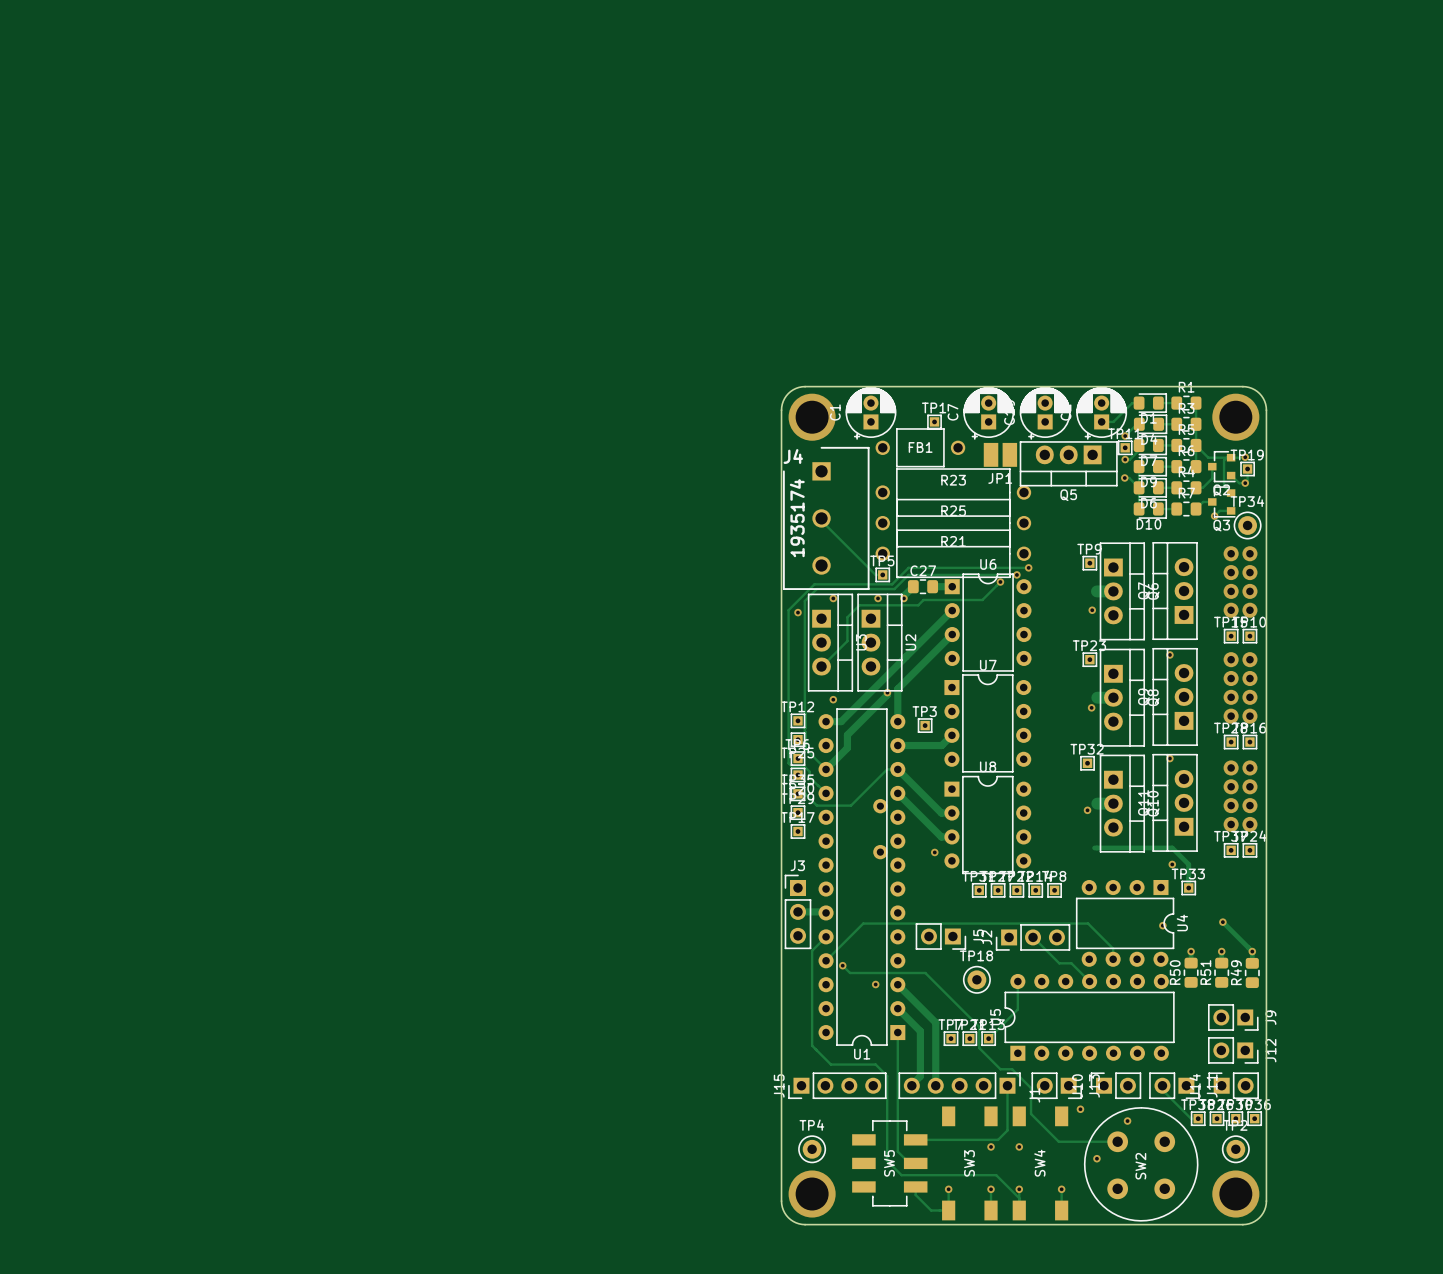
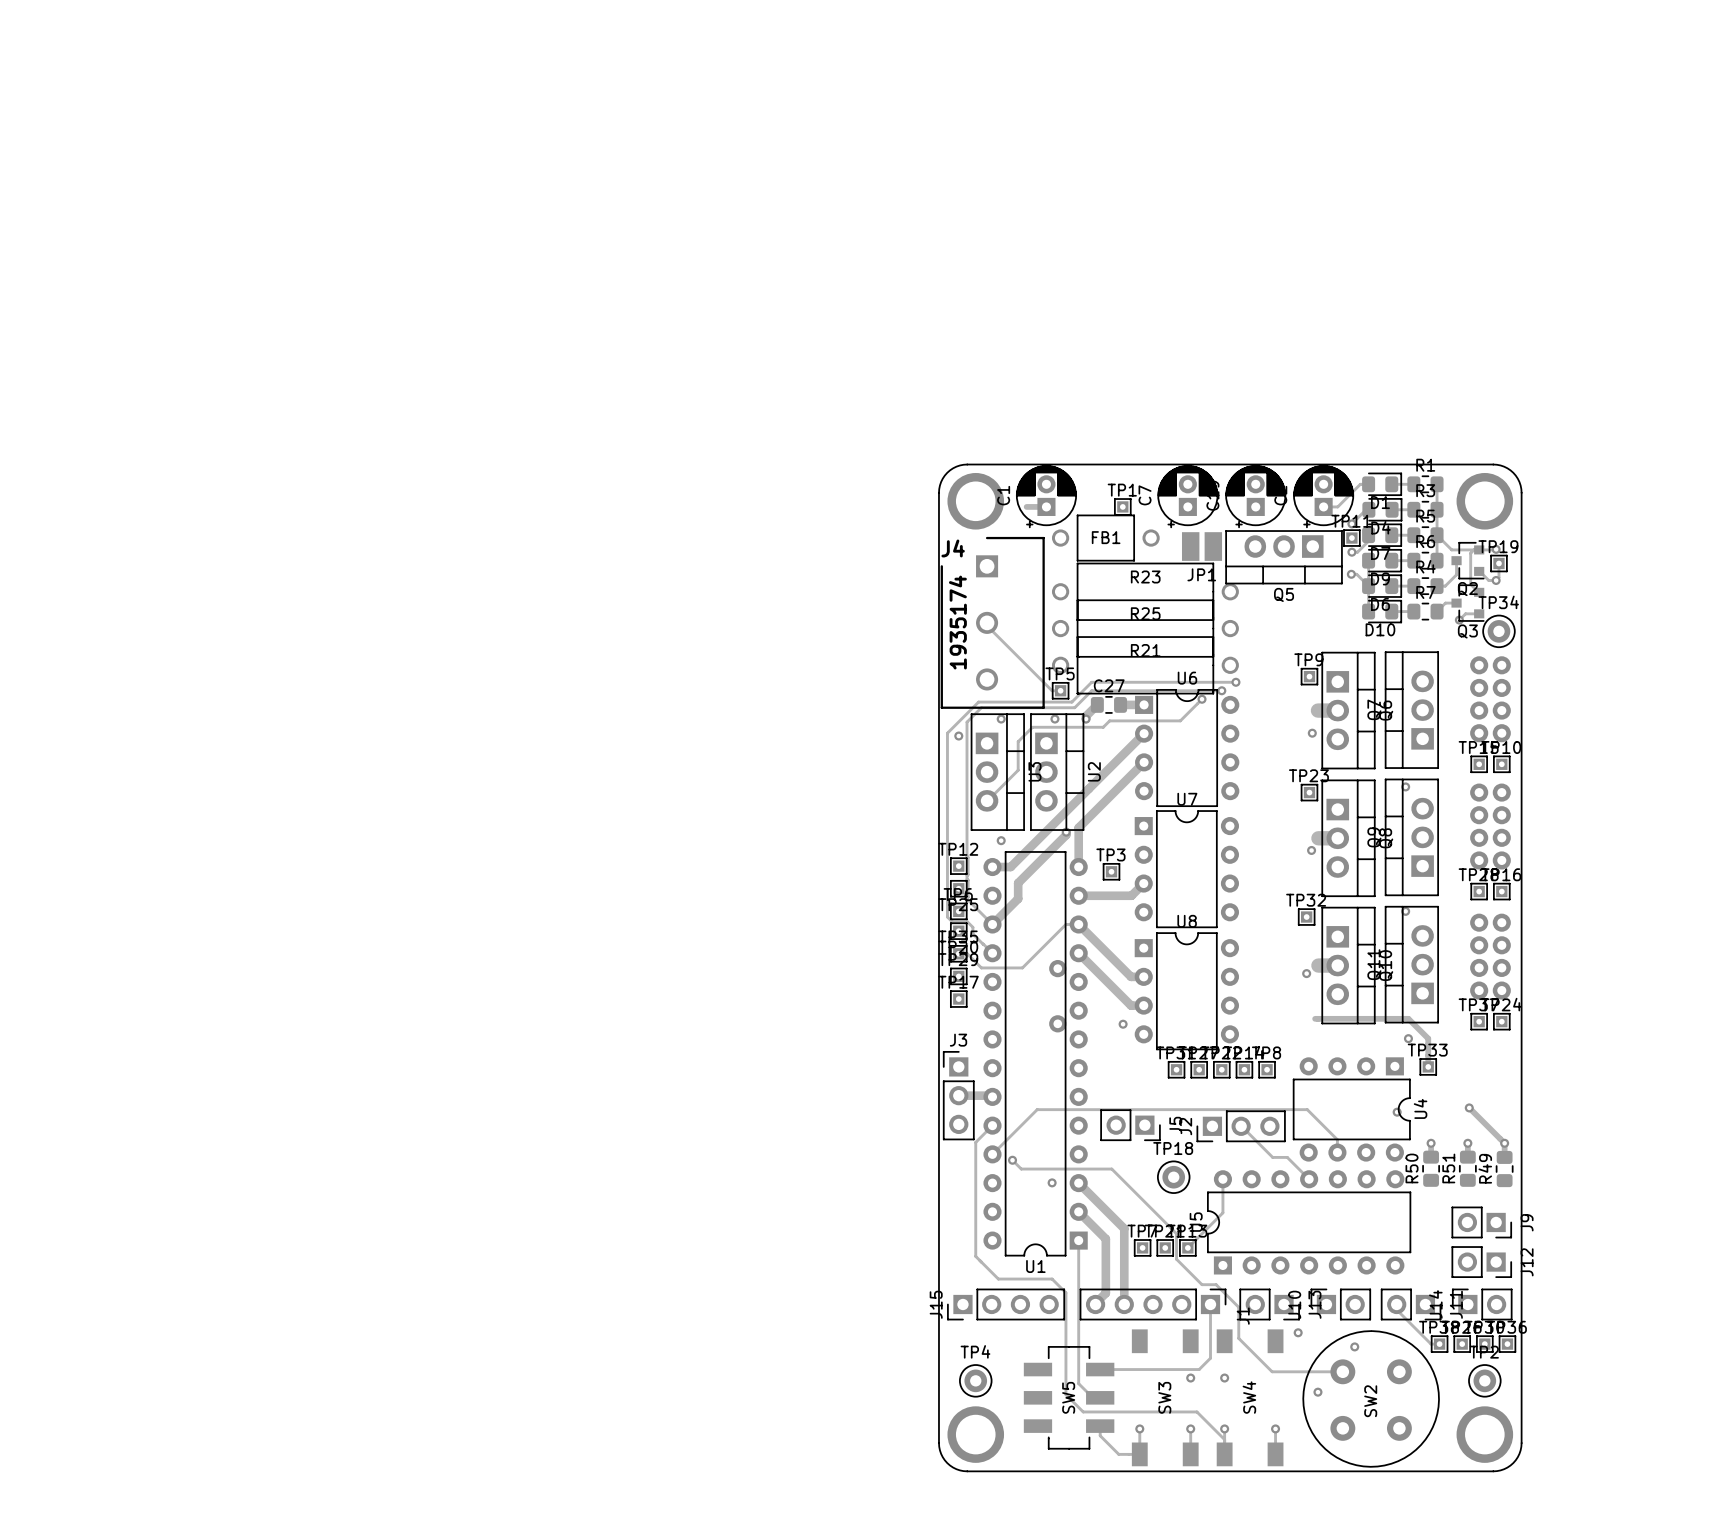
track: none -> (1026, 506) (1046, 506)

